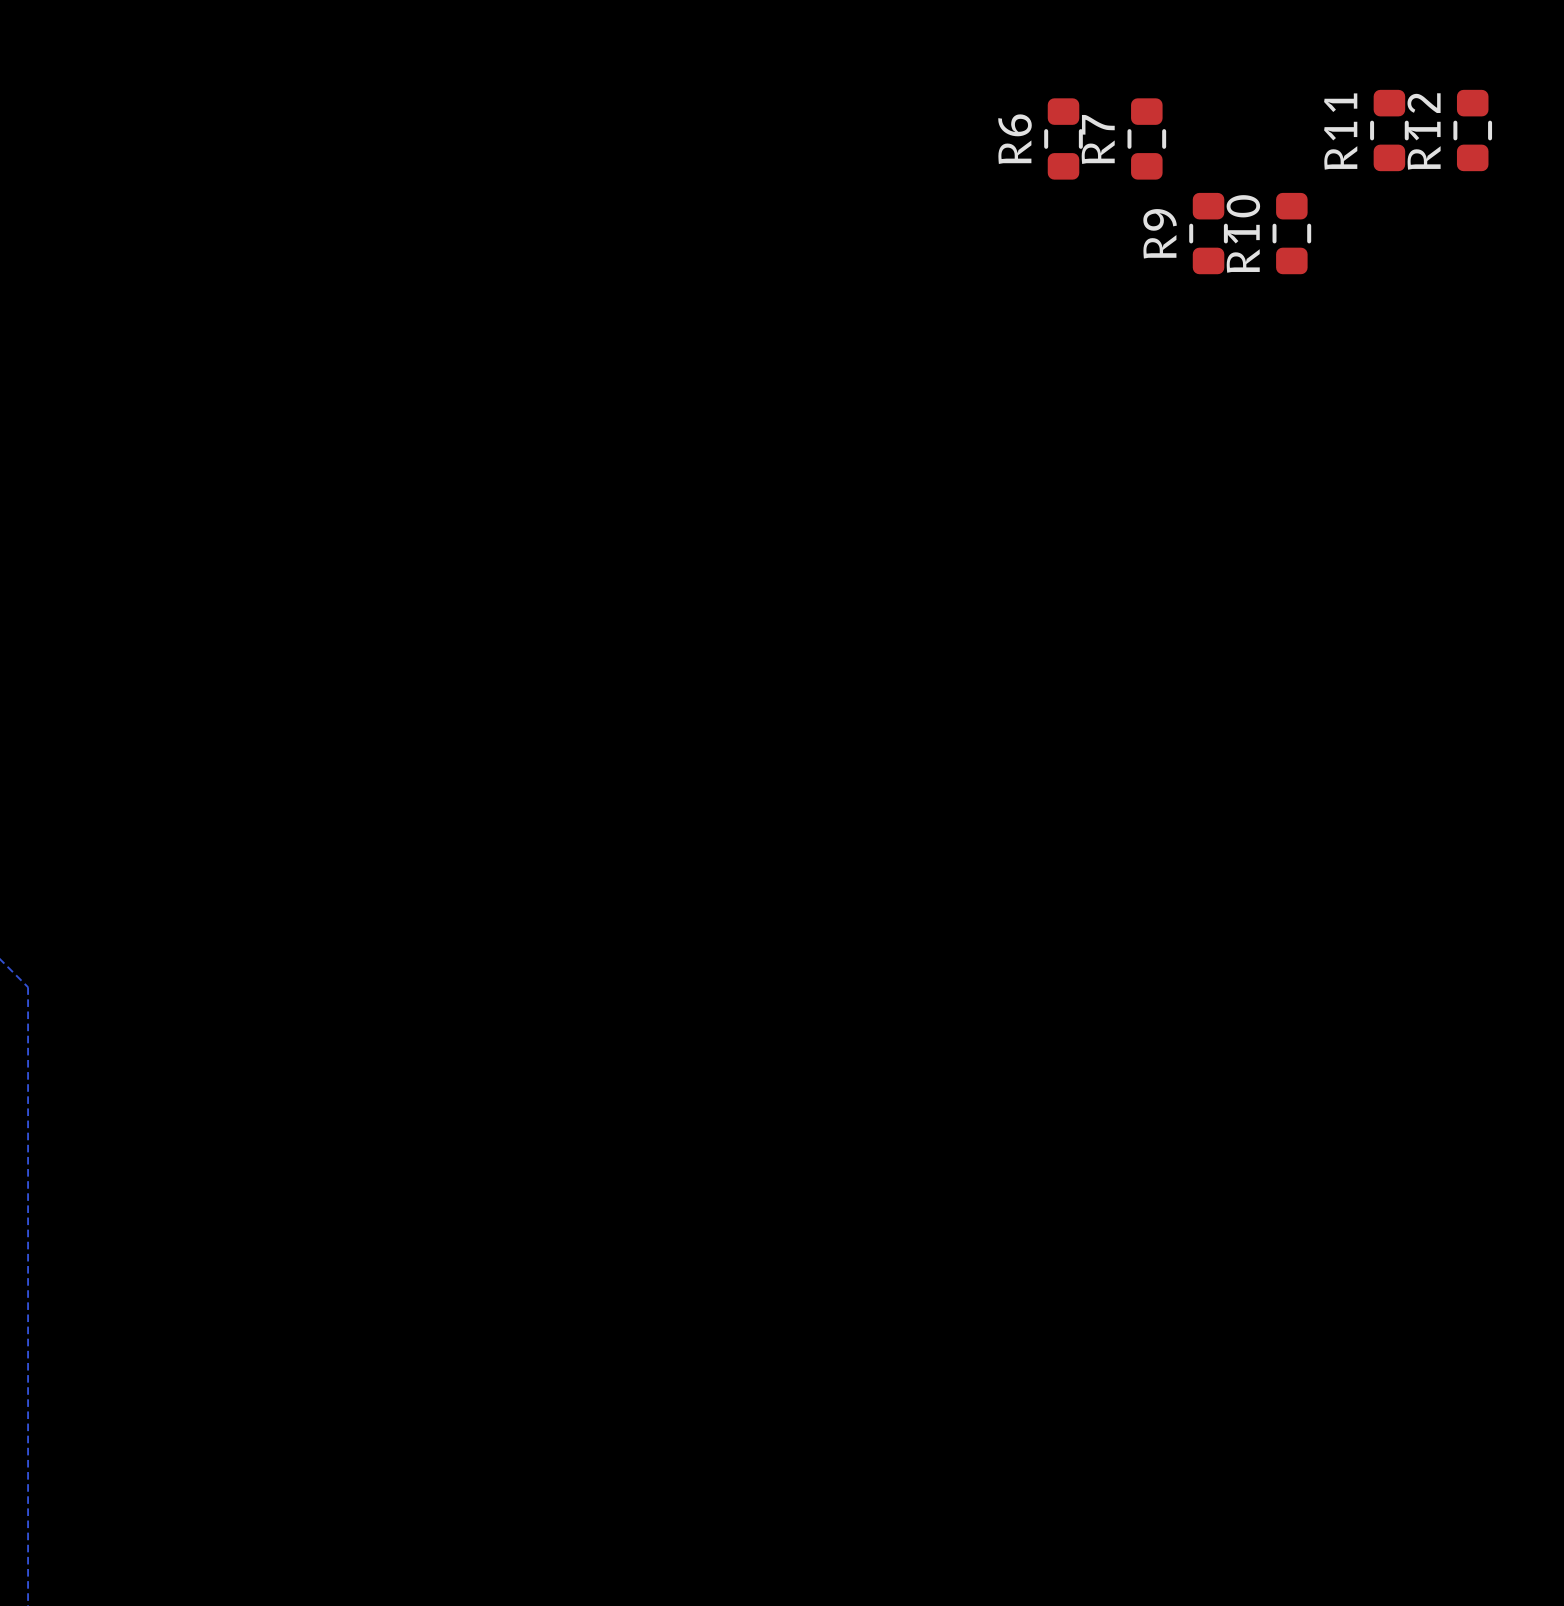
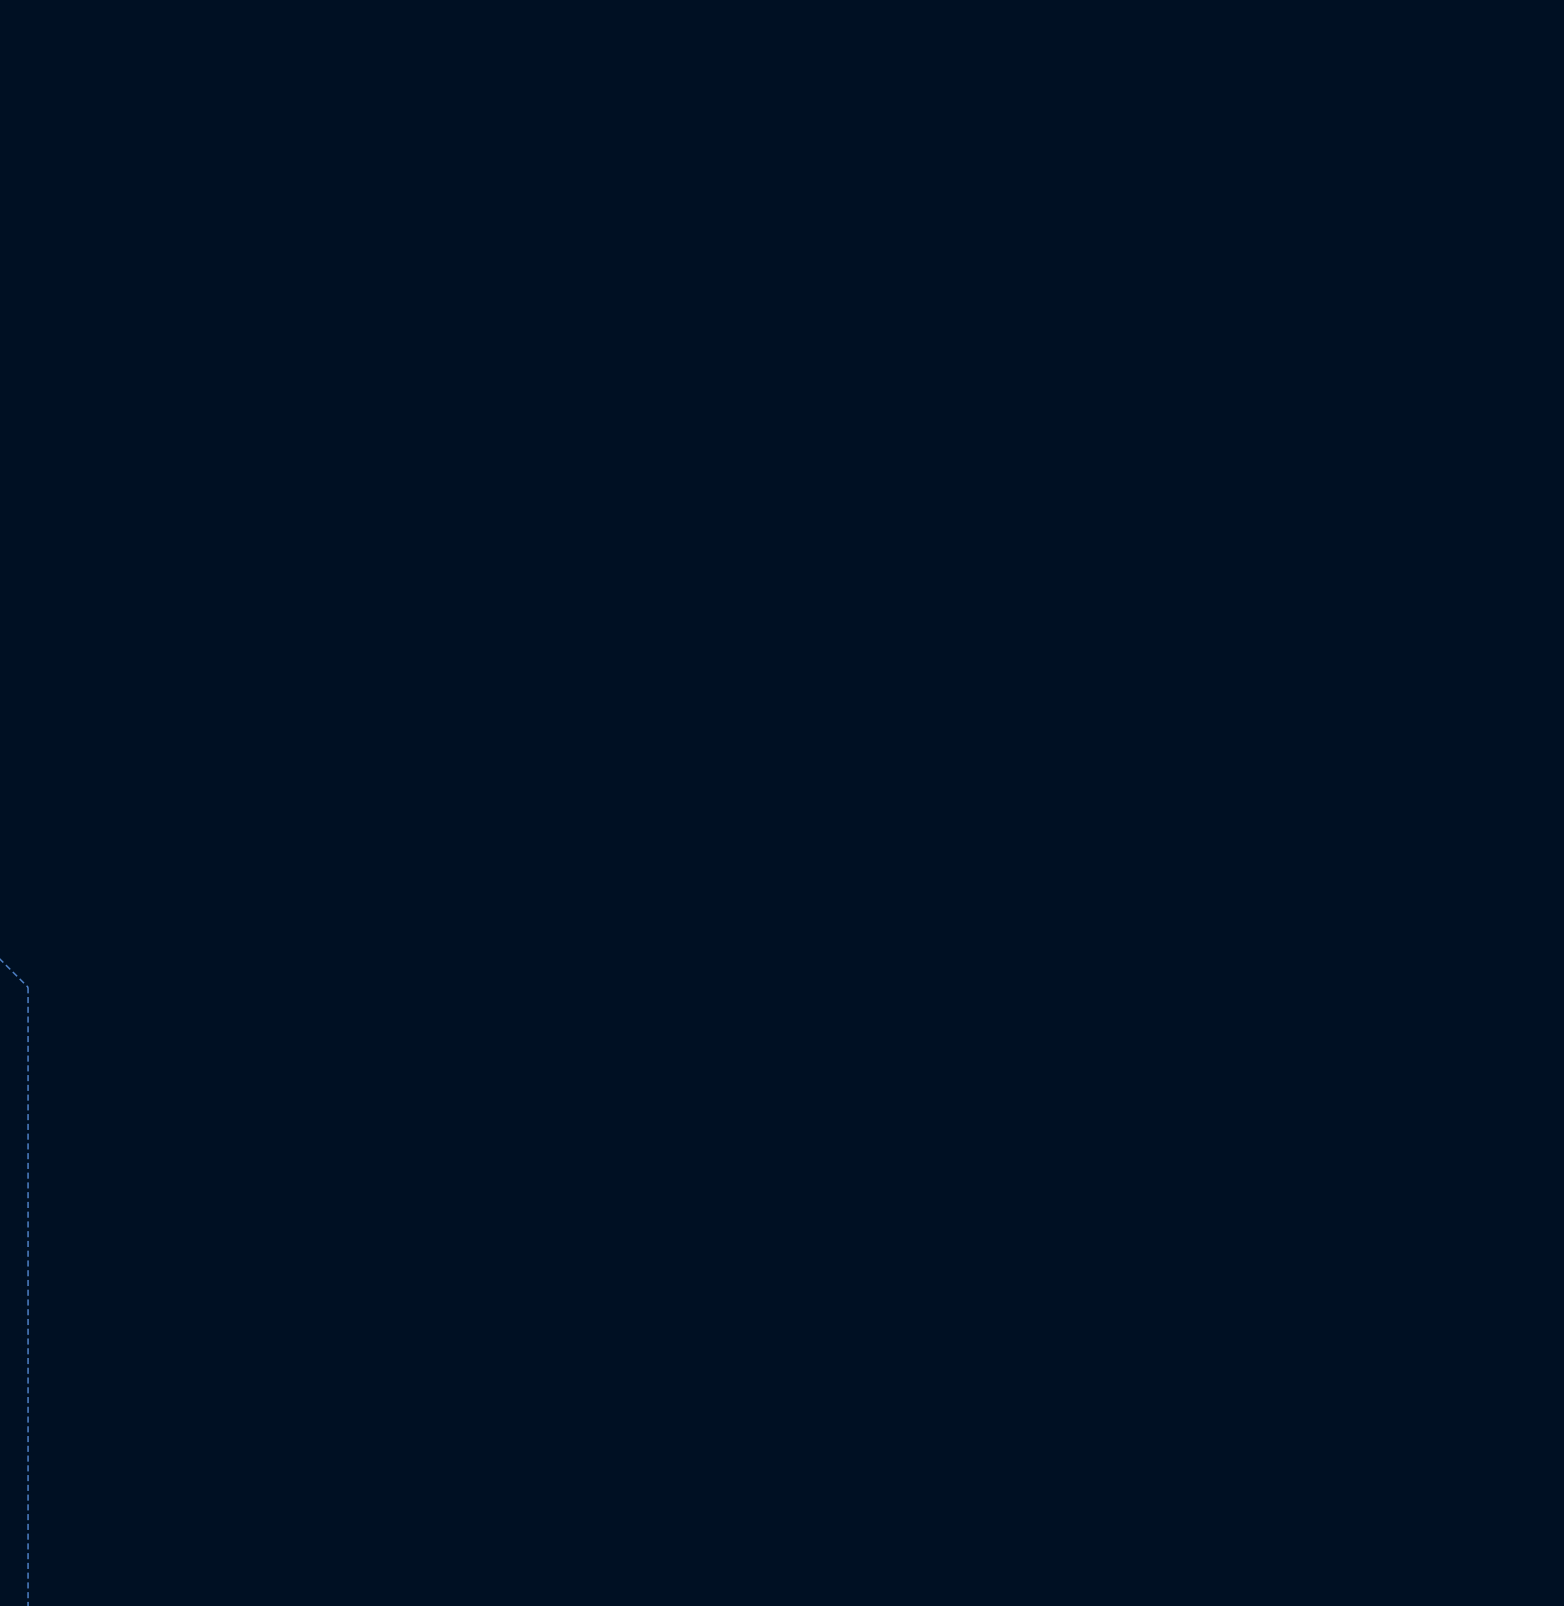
R11: (1389, 130) -> none
R12: (1472, 130) -> none
R6: (1063, 138) -> none
R7: (1146, 138) -> none
R9: (1208, 233) -> none
R10: (1291, 233) -> none

